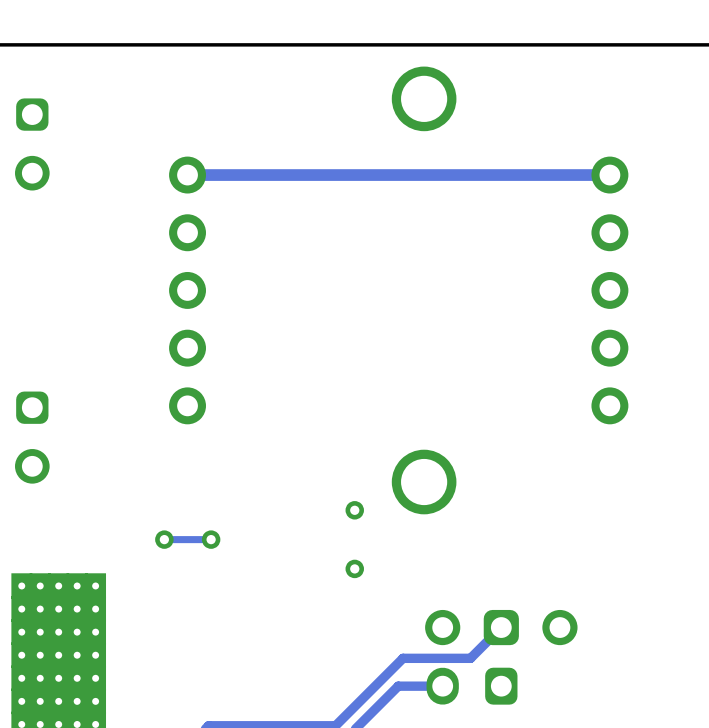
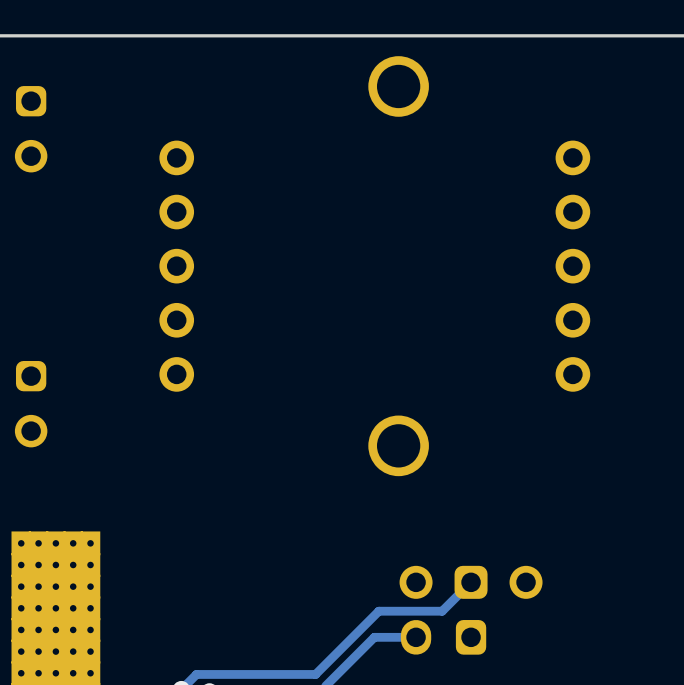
track: (609, 175) (187, 175) -> none
via: (354, 510) -> none
via: (164, 539) -> none
track: (211, 539) (164, 539) -> none
via: (211, 539) -> none
via: (354, 568) -> none

